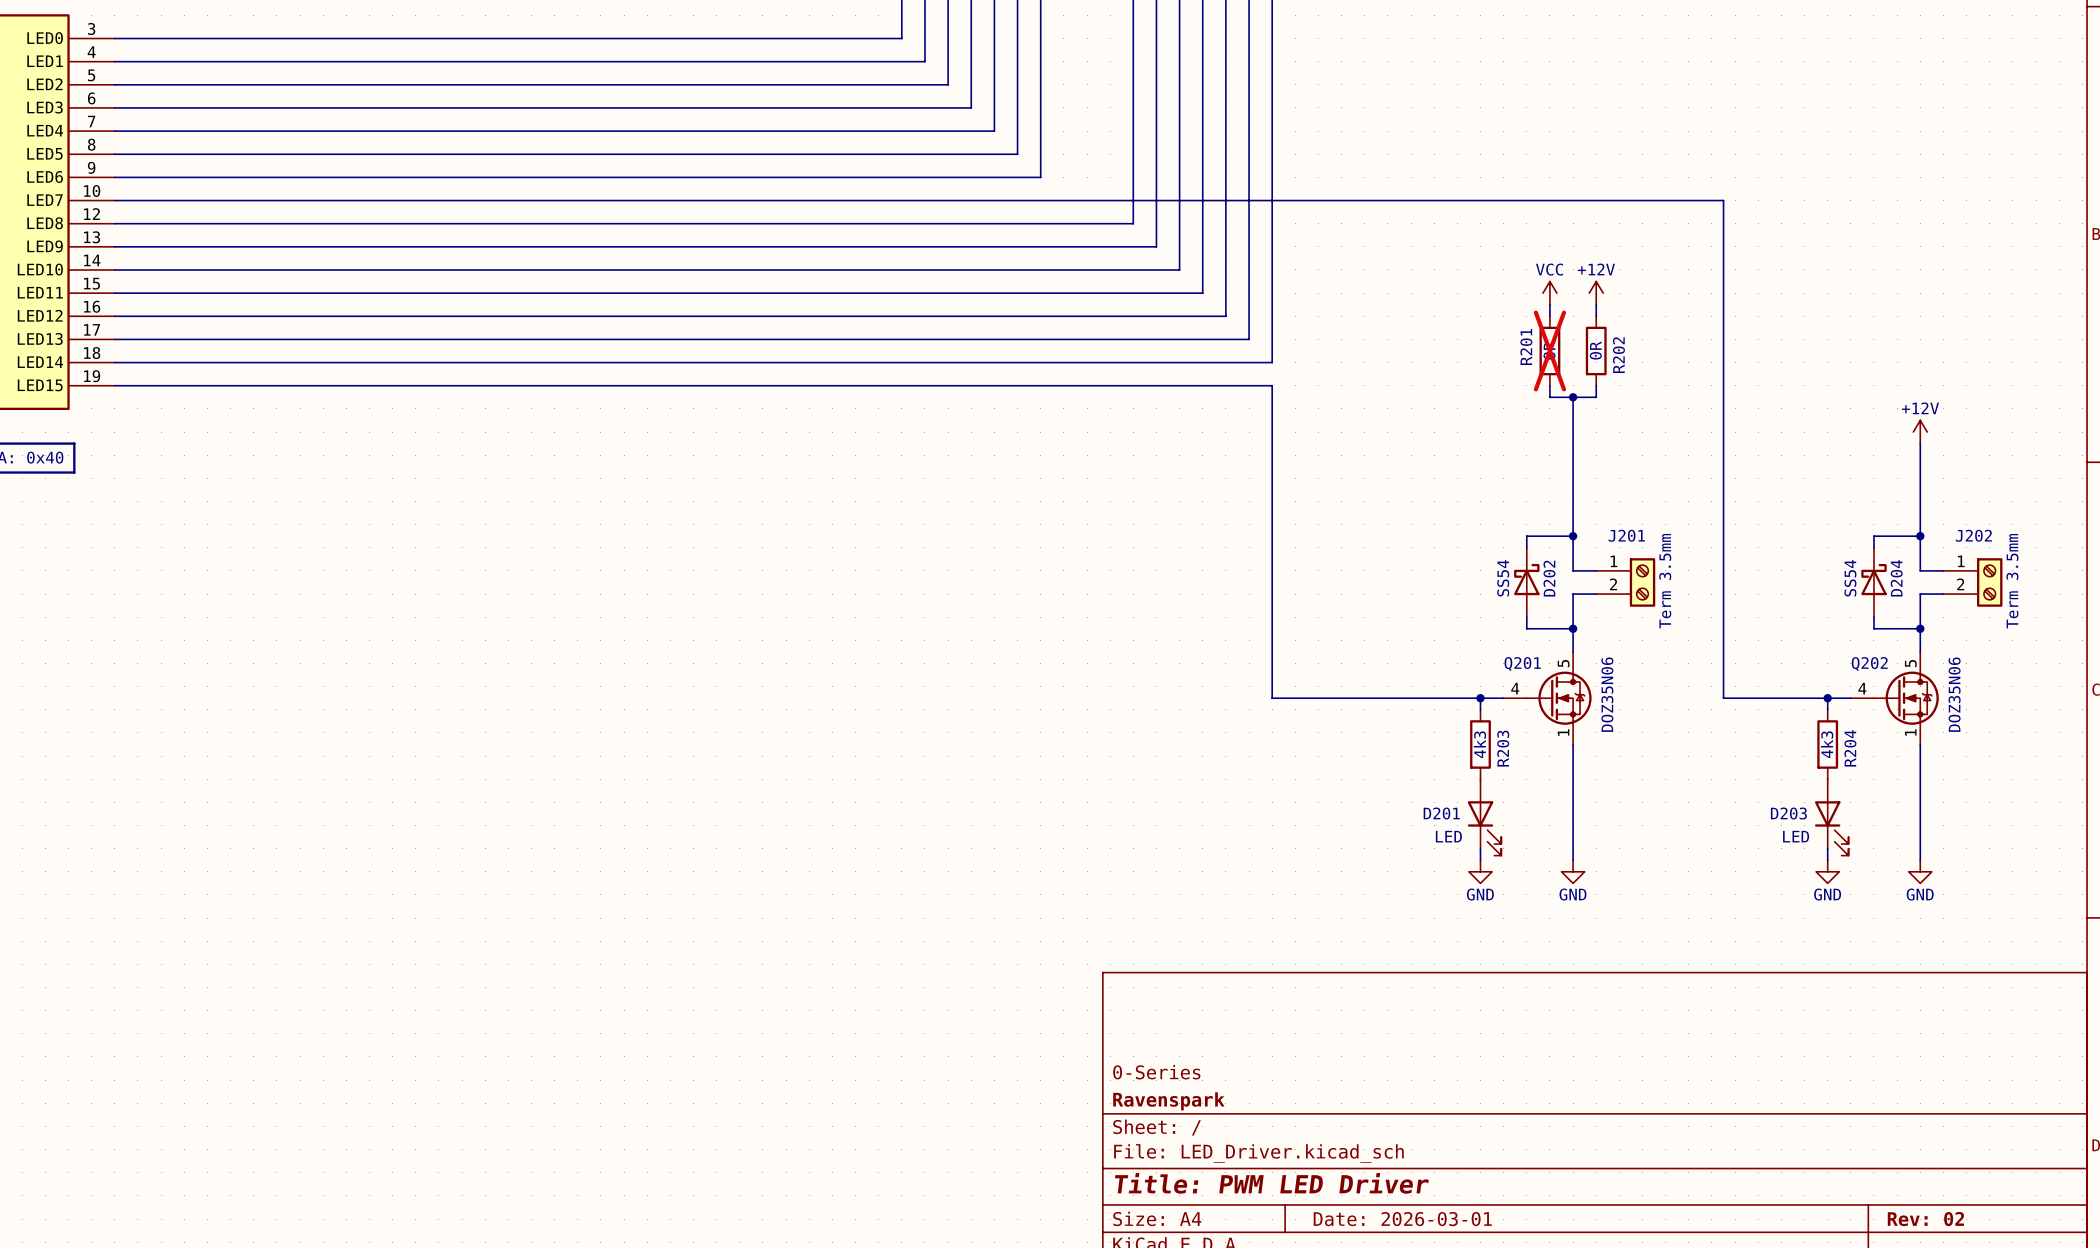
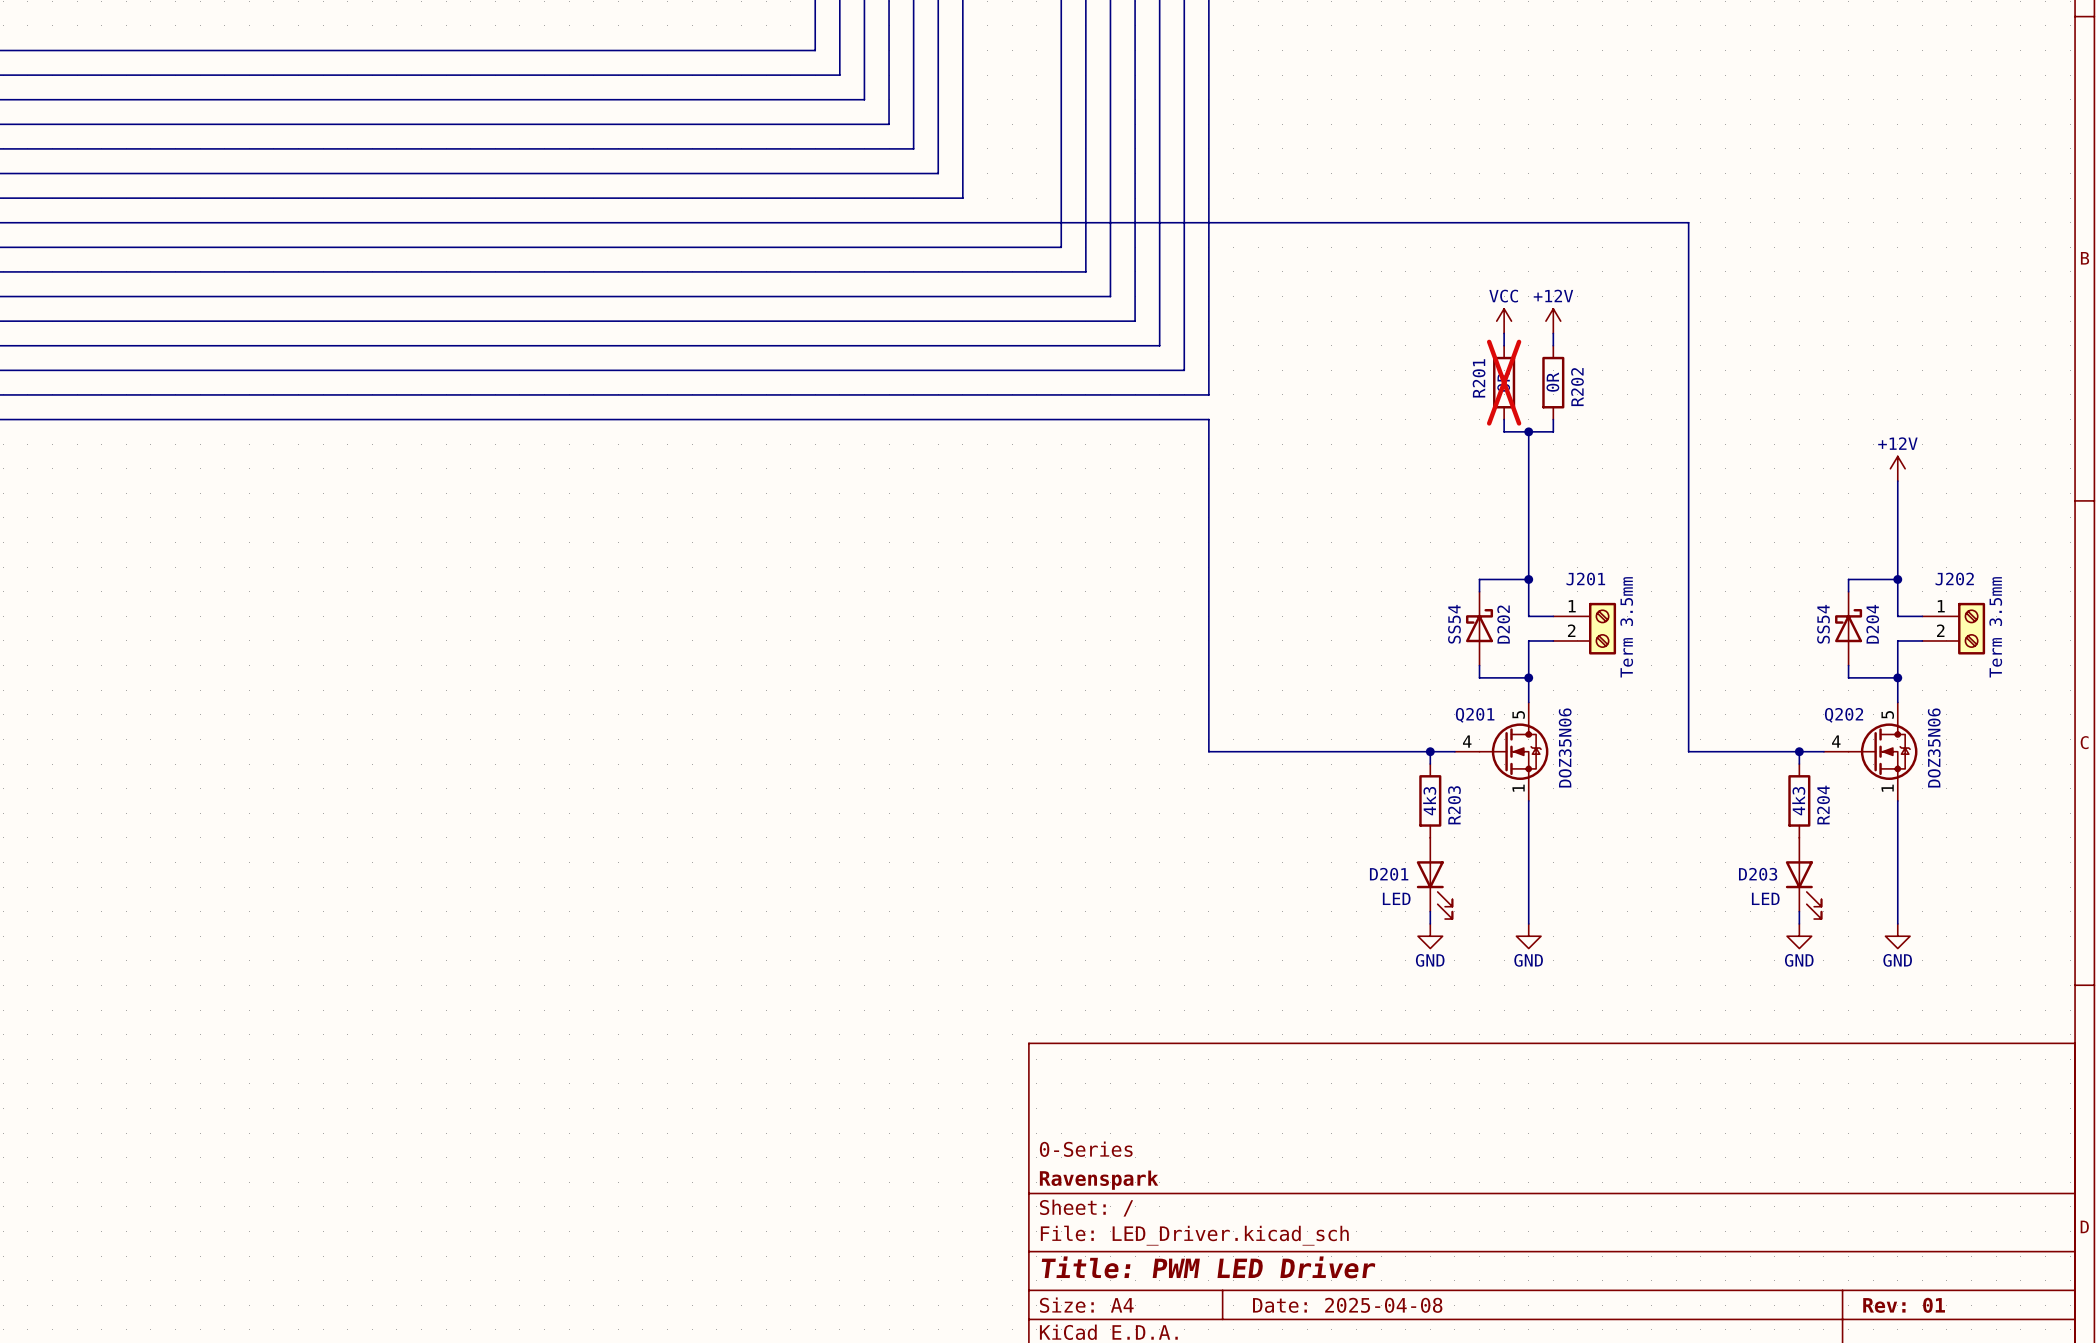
title block: Date: 2026-03-01 (1402, 1219) -> Date: 2025-04-08 (1347, 1305)
title block: Rev: 02 (1925, 1219) -> Rev: 01 (1904, 1305)

